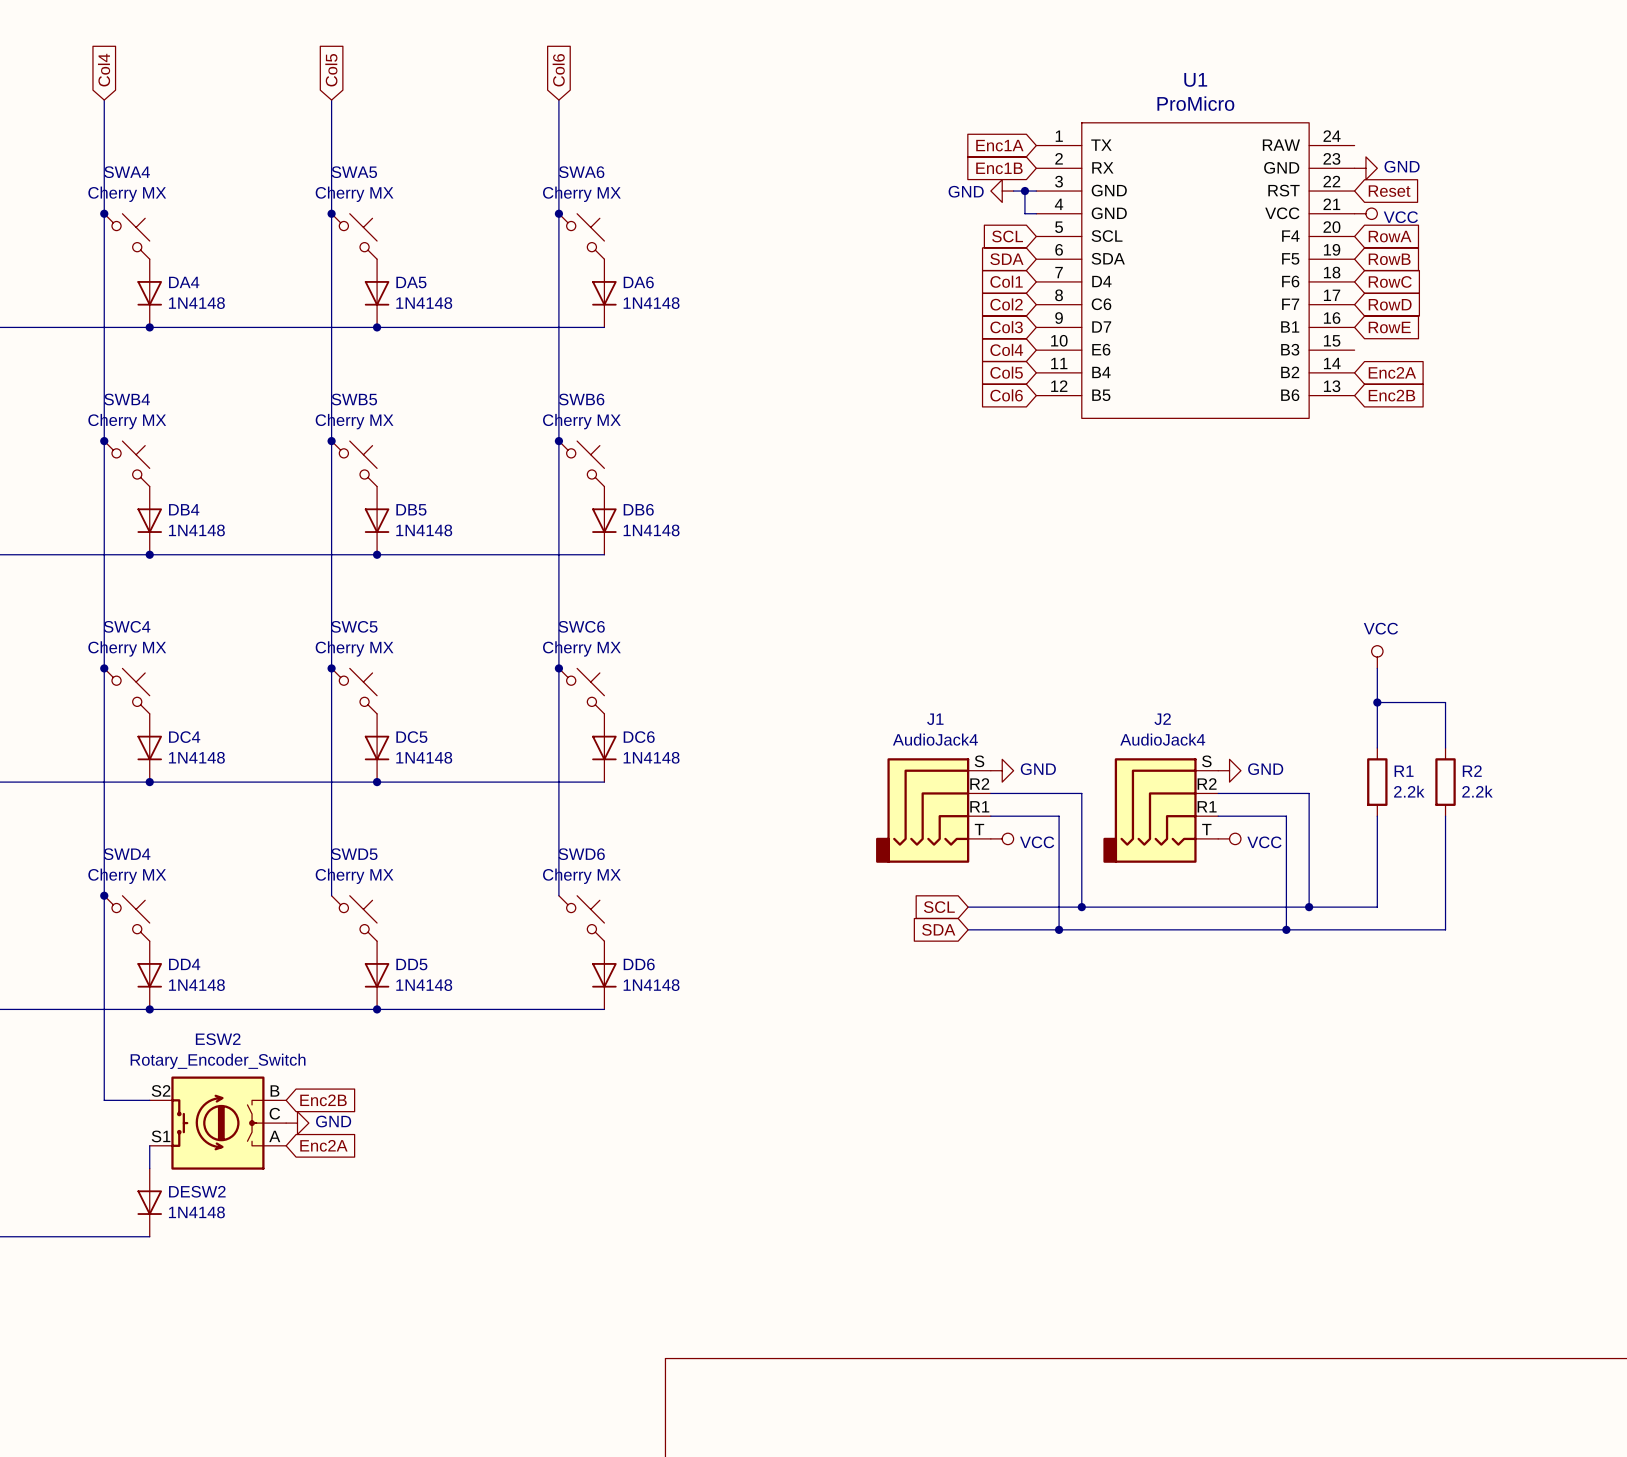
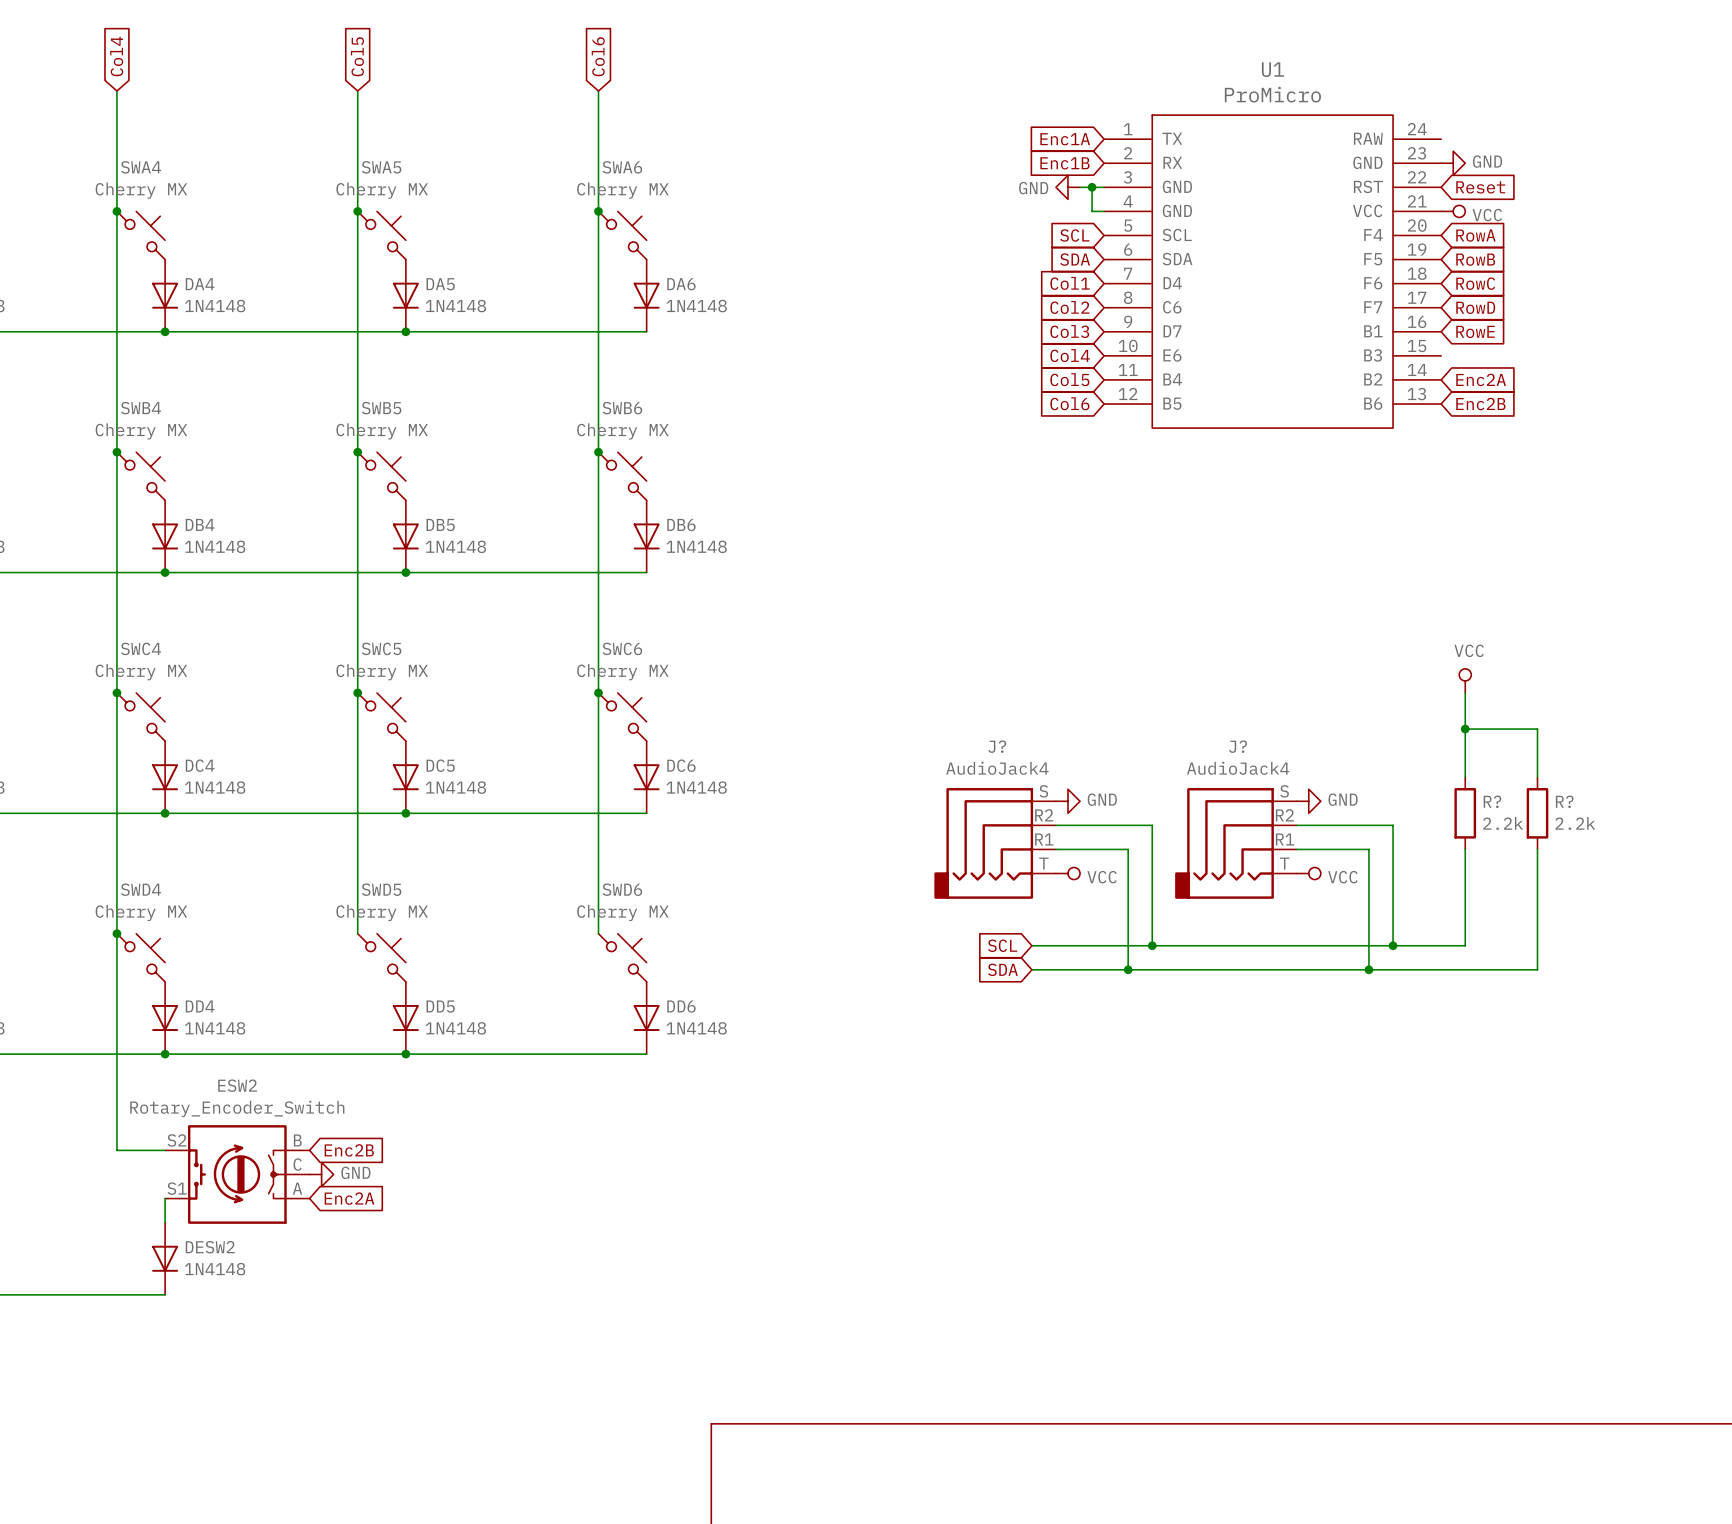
J1 name: J1 (935, 719) -> J? (997, 746)
J2 name: J2 (1162, 719) -> J? (1238, 746)
R1 name: R1 (1404, 771) -> R? (1492, 801)
R2 name: R2 (1472, 771) -> R? (1564, 801)

